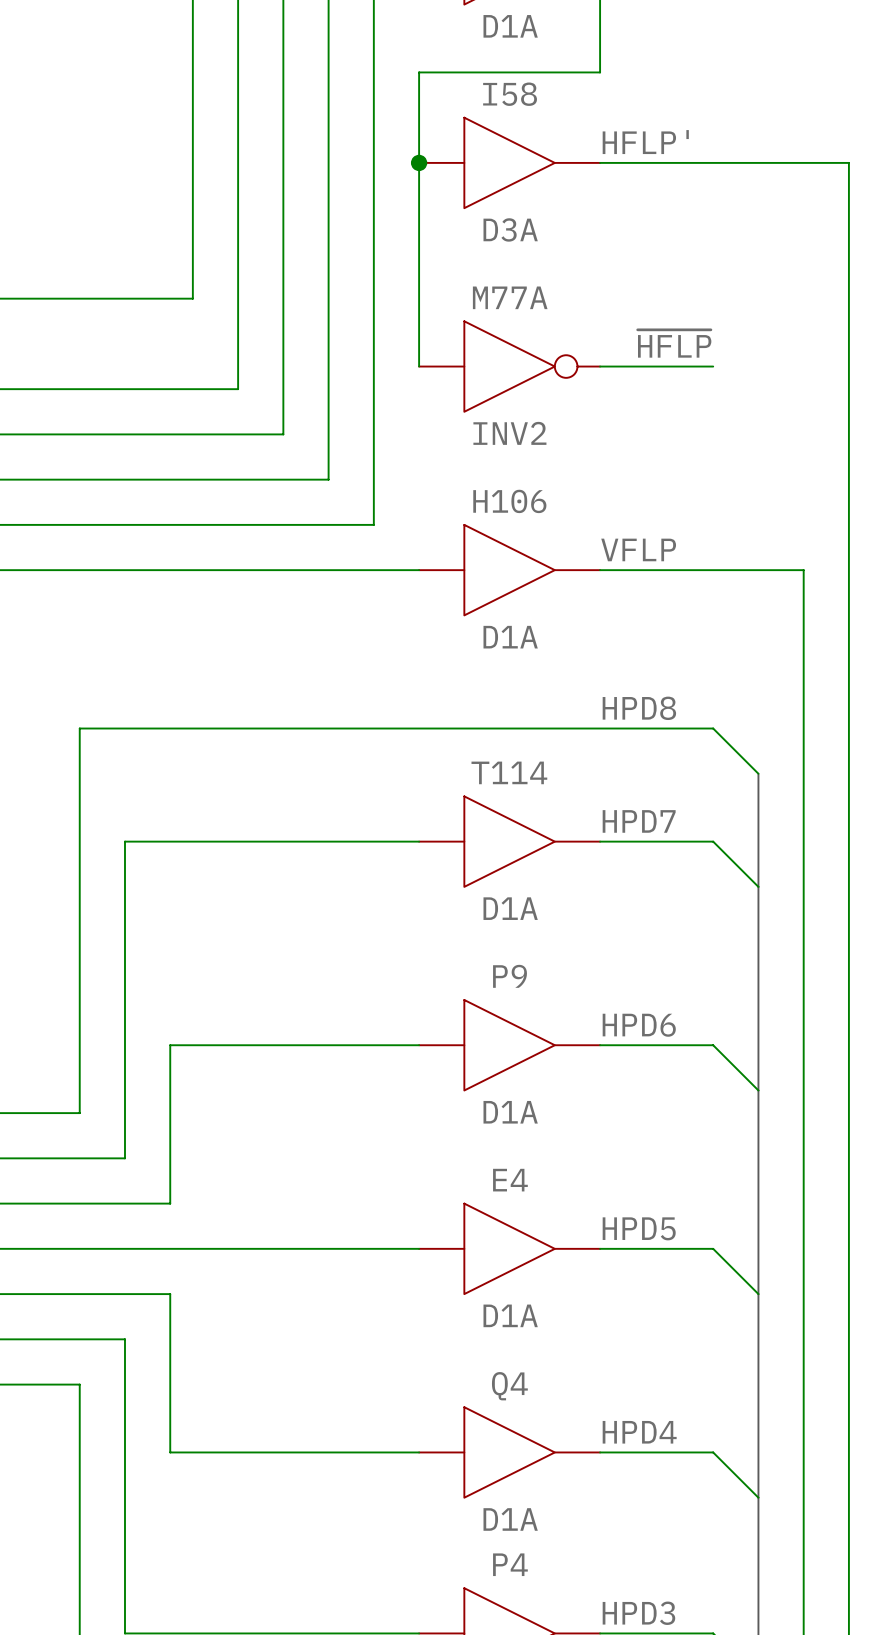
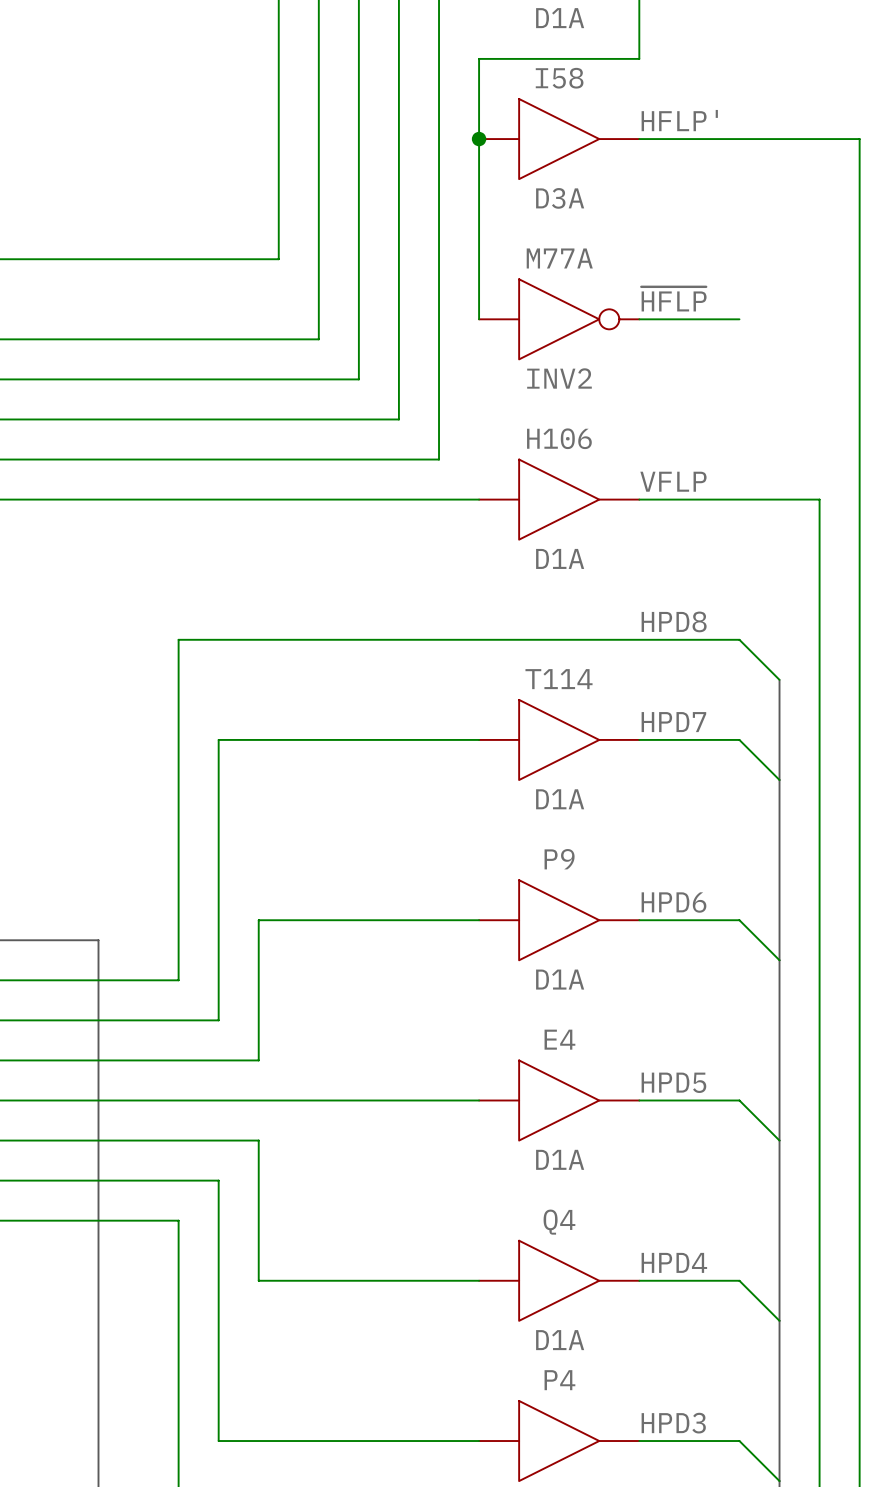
label position: ~{HFLP} (674, 343) -> ~{HFLP} (673, 299)

